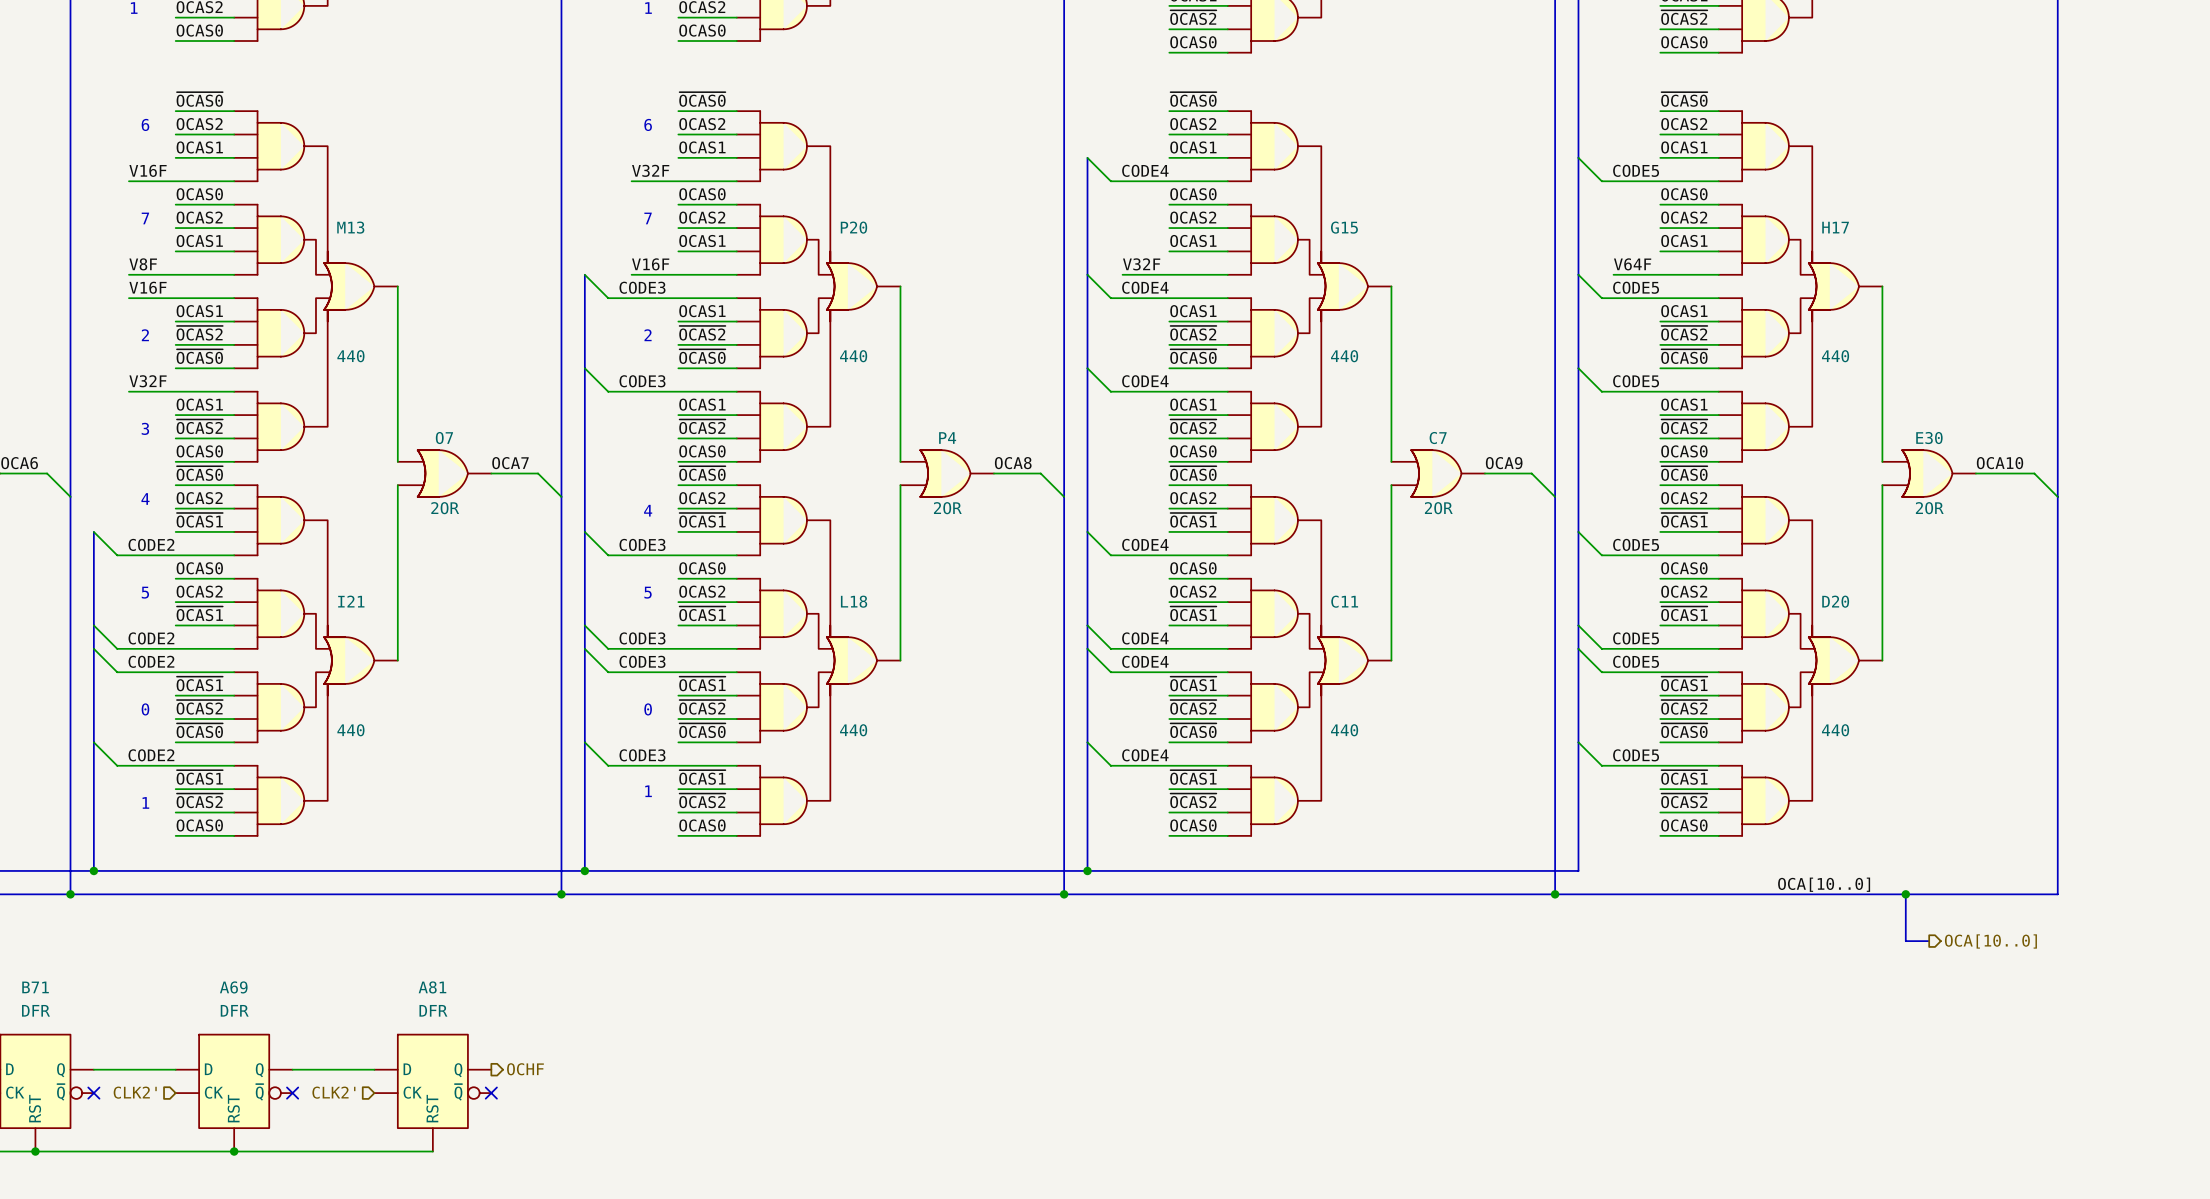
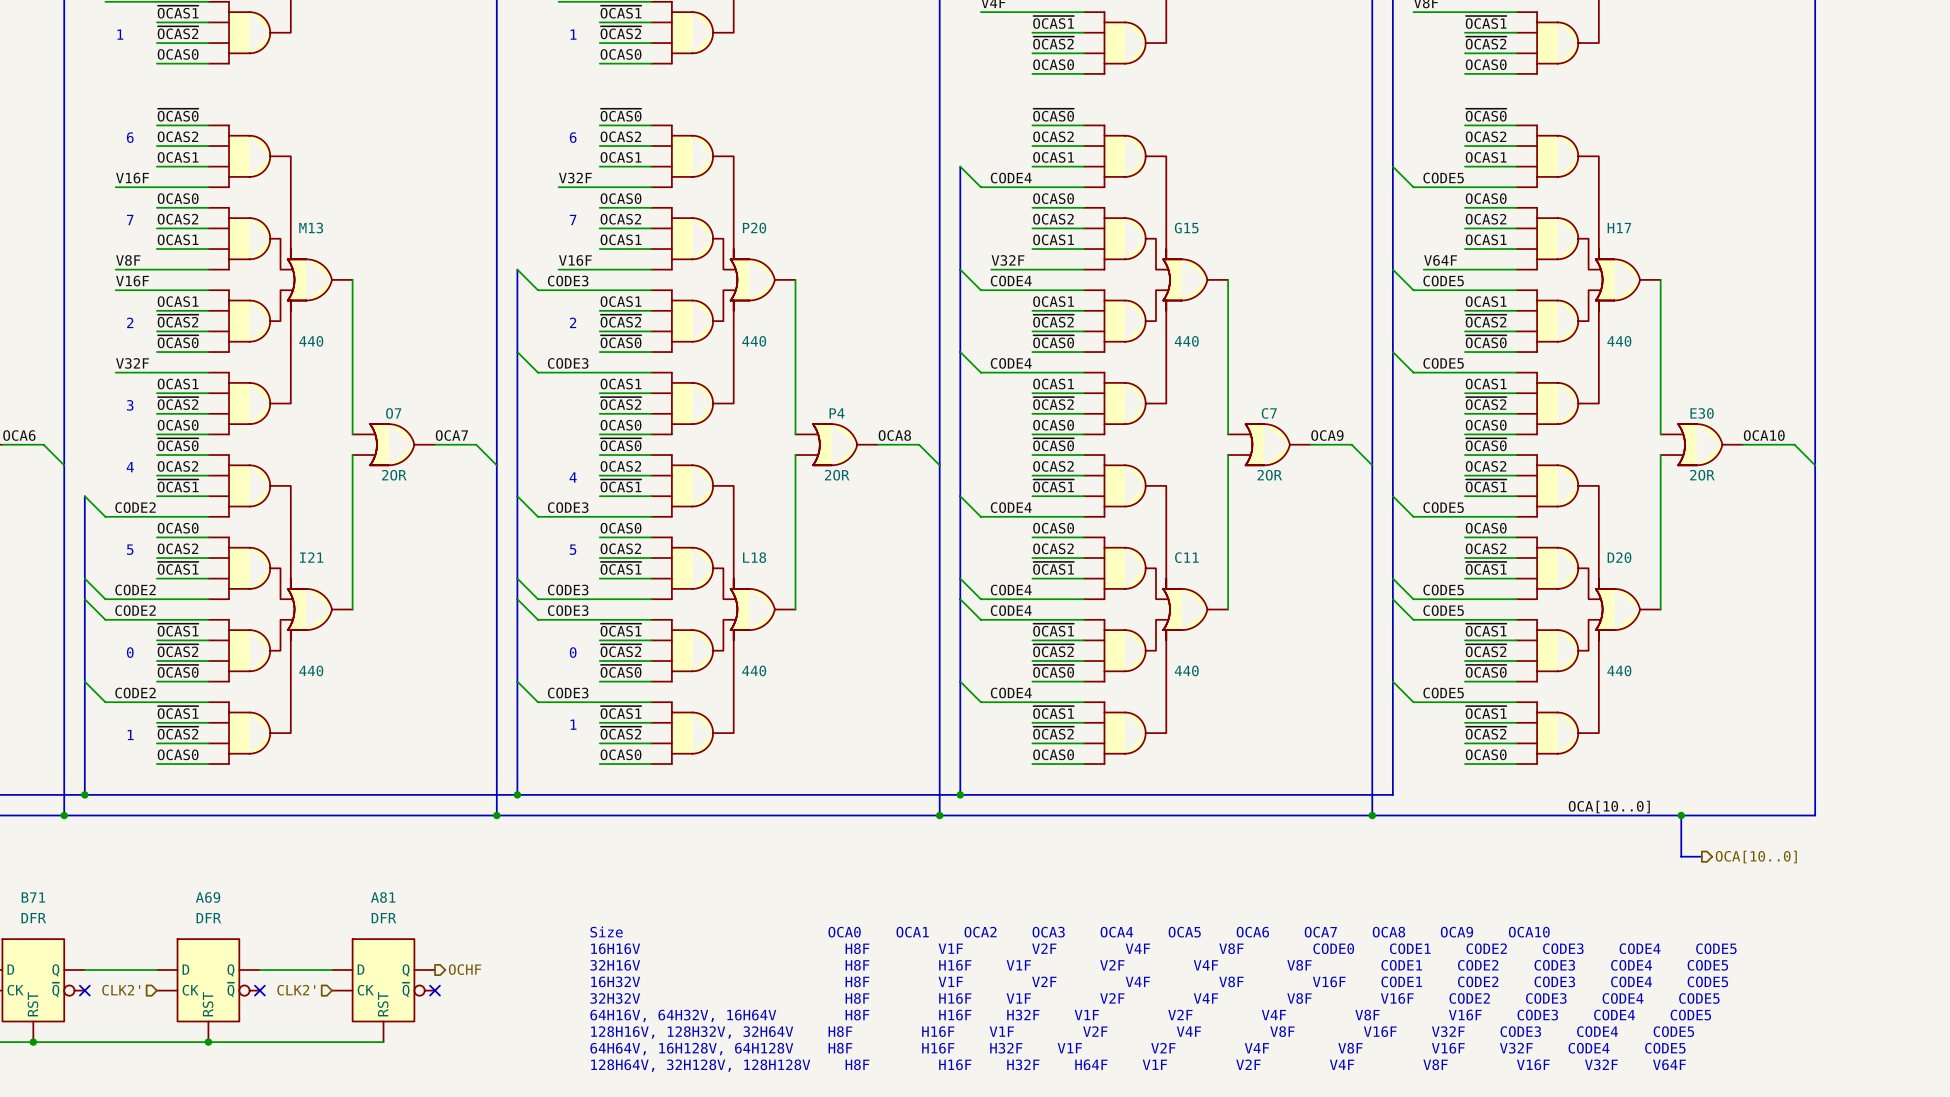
text: none -> Size OCA0 OCA1 OCA2 OCA3 OCA4 OCA5 OCA6 OCA7 OCA8 OCA9 OCA10 (1070, 932)
text: none -> 16H16V H8F V1F V2F V4F V8F CODE0 CODE1 CODE2 CODE3 CODE4 CODE5 (1163, 948)
text: none -> 32H16V H8F H16F V1F V2F V4F V8F CODE1 CODE2 CODE3 CODE4 CODE5 (1159, 965)
text: none -> 16H32V H8F V1F V2F V4F V8F V16F CODE1 CODE2 CODE3 CODE4 CODE5 (1159, 981)
text: none -> 32H32V H8F H16F V1F V2F V4F V8F V16F CODE2 CODE3 CODE4 CODE5 (1155, 998)
text: none -> 64H16V, 64H32V, 16H64V H8F H16F H32F V1F V2F V4F V8F V16F CODE3 CODE4 CODE5 (1150, 1015)
text: none -> 128H16V, 128H32V, 32H64V H8F H16F V1F V2F V4F V8F V16F V32F CODE3 CODE4 CODE5 (1142, 1032)
text: none -> 64H64V, 16H128V, 64H128V H8F H16F H32F V1F V2F V4F V8F V16F V32F CODE4 CODE5 (1137, 1049)
text: none -> 128H64V, 32H128V, 128H128V H8F H16F H32F H64F V1F V2F V4F V8F V16F V32F V64F (1138, 1065)

